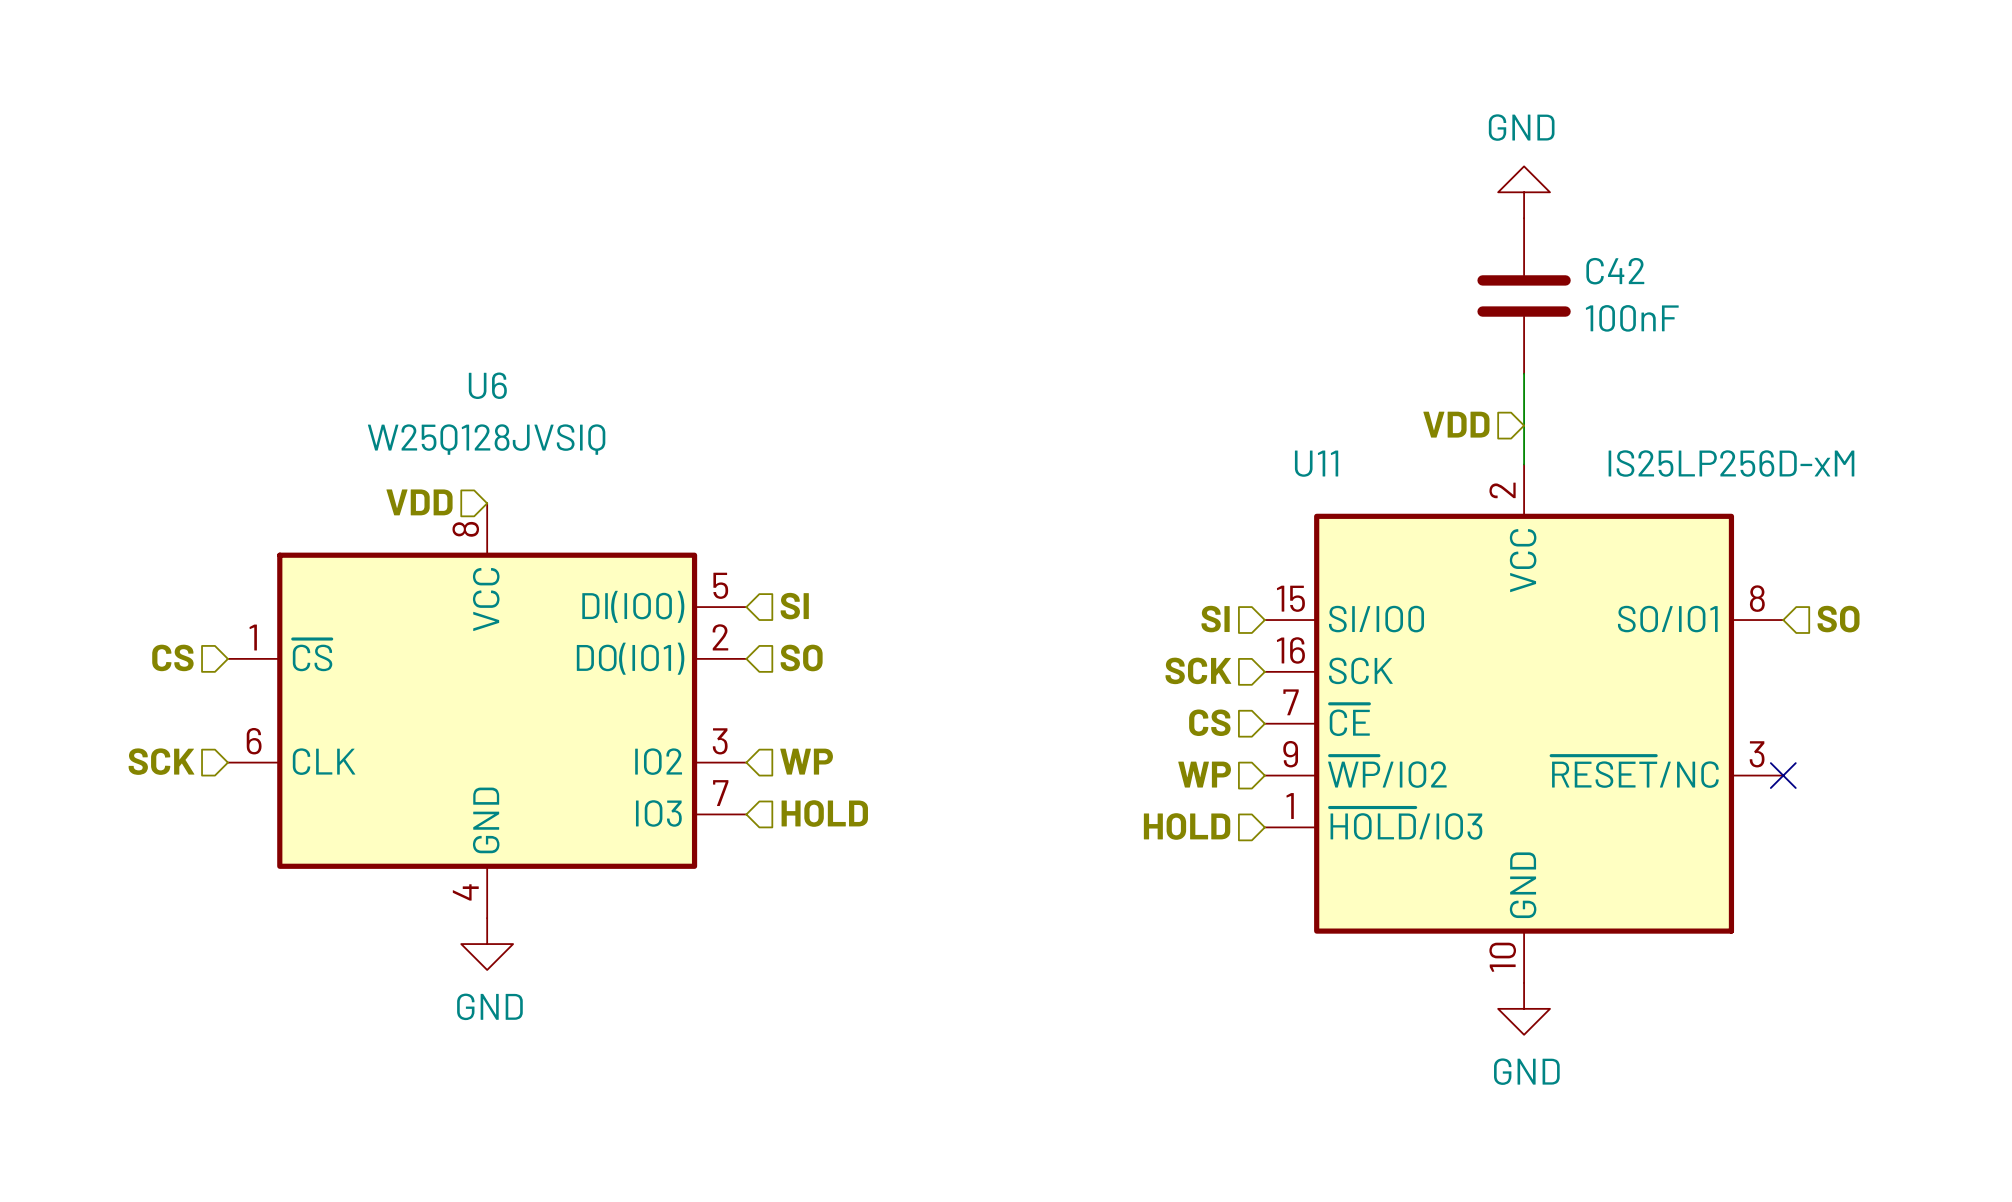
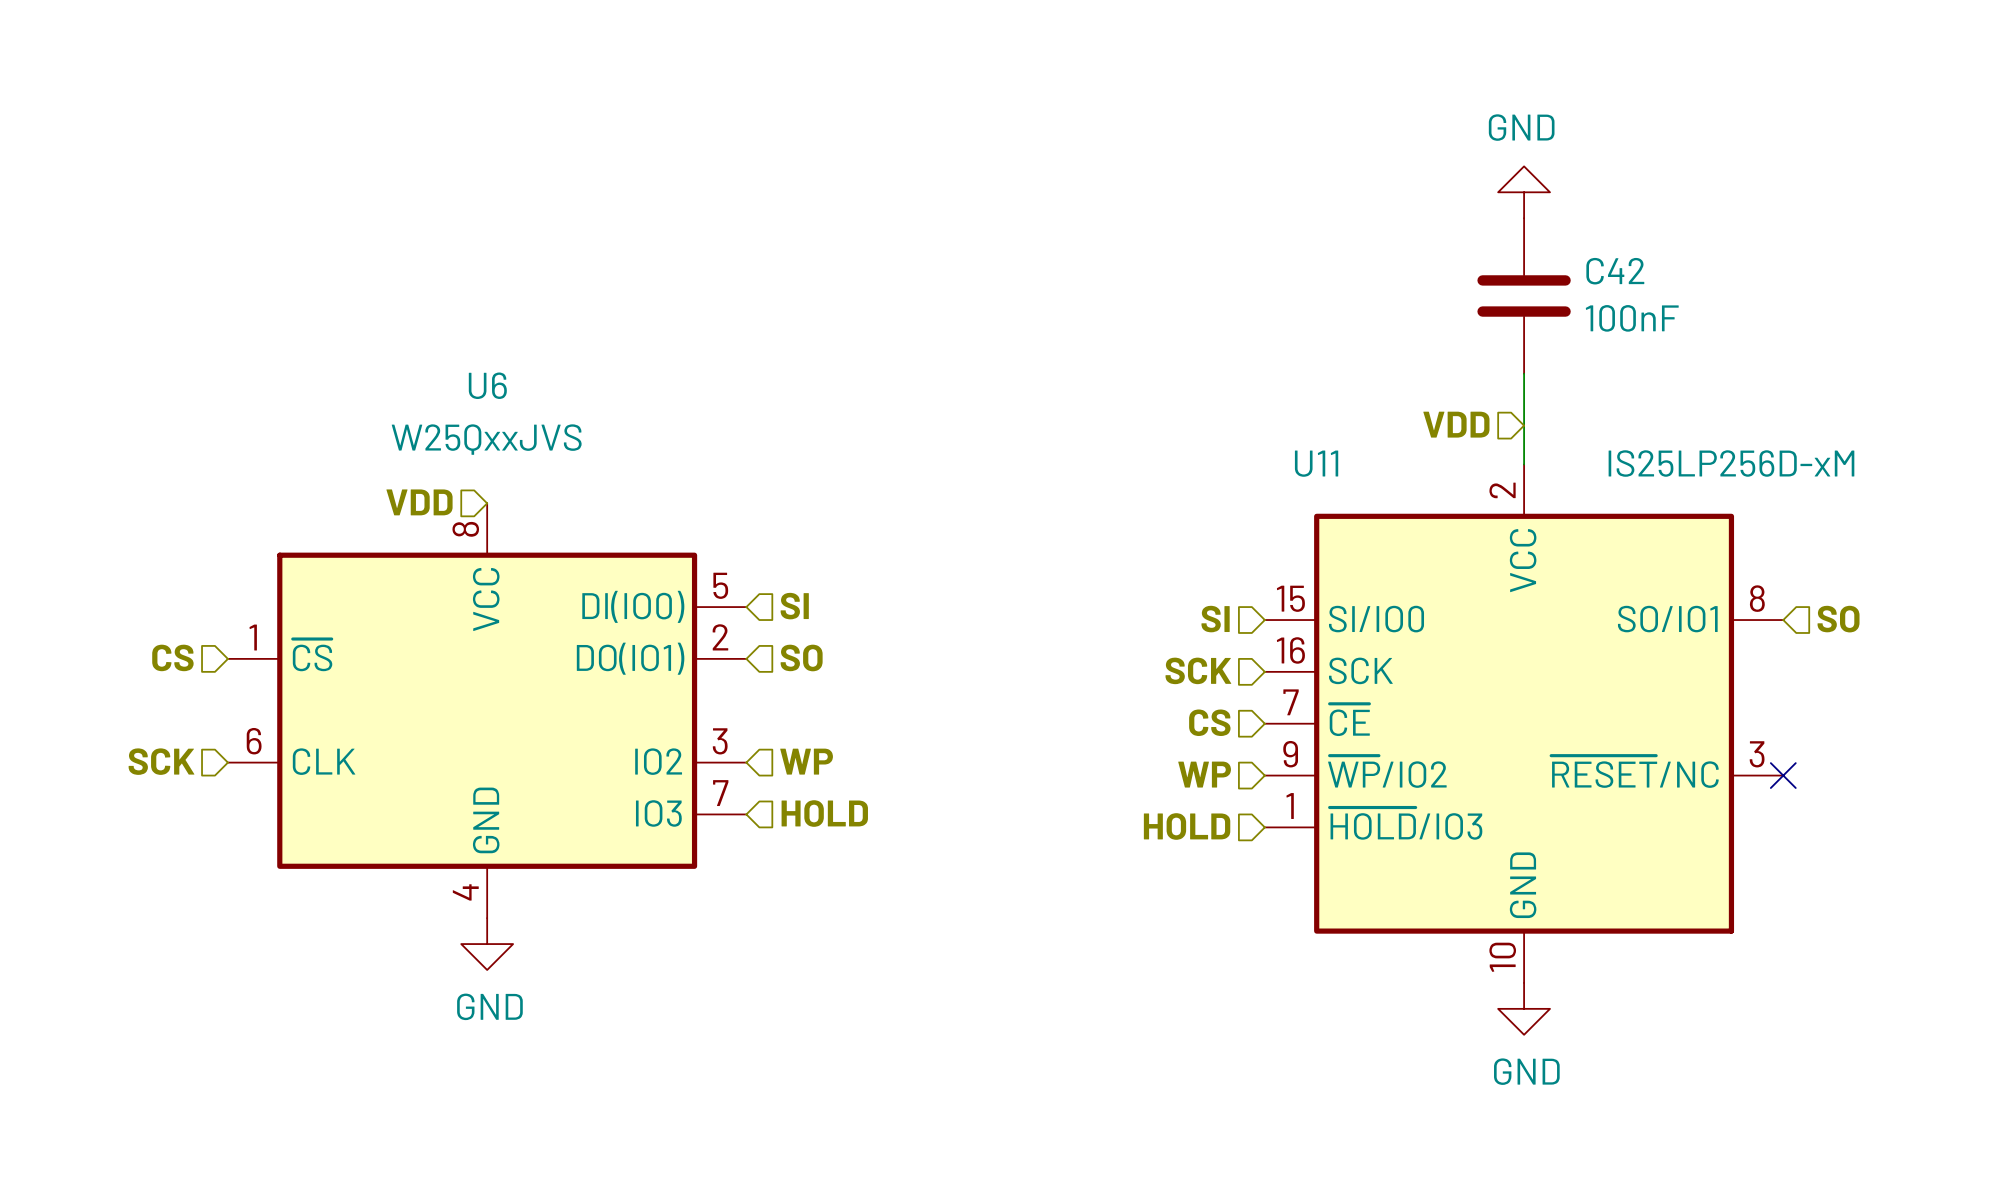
U6 value: W25Q128JVSIQ (486, 439) -> W25QxxJVS (486, 439)

